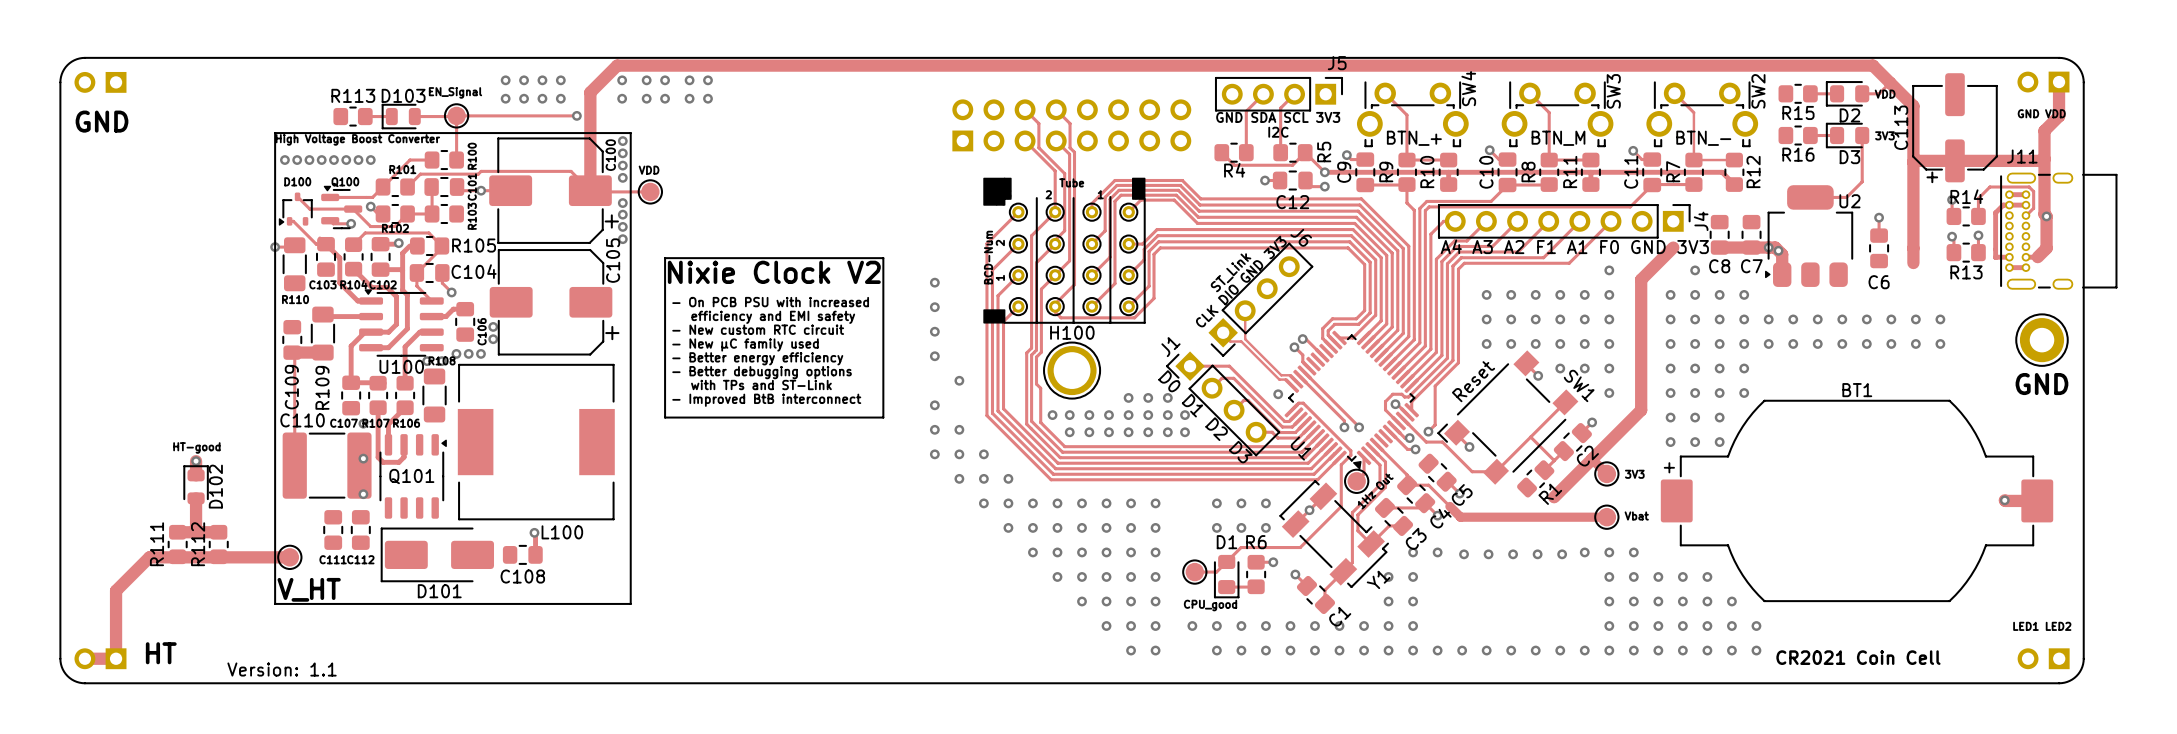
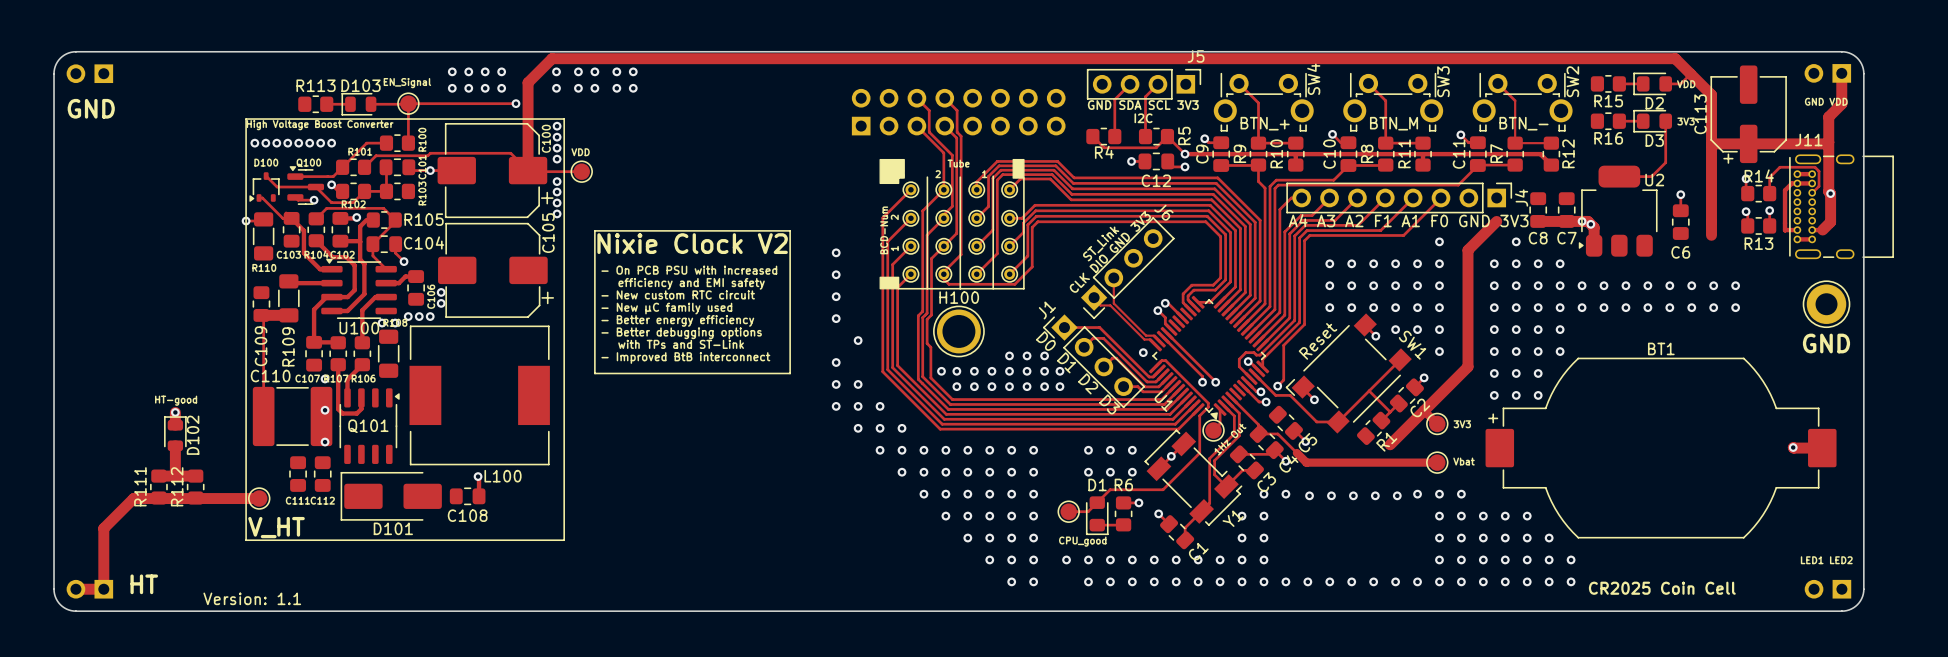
text: CR2021 Coin Cell (1858, 657) -> CR2025 Coin Cell (1662, 588)

